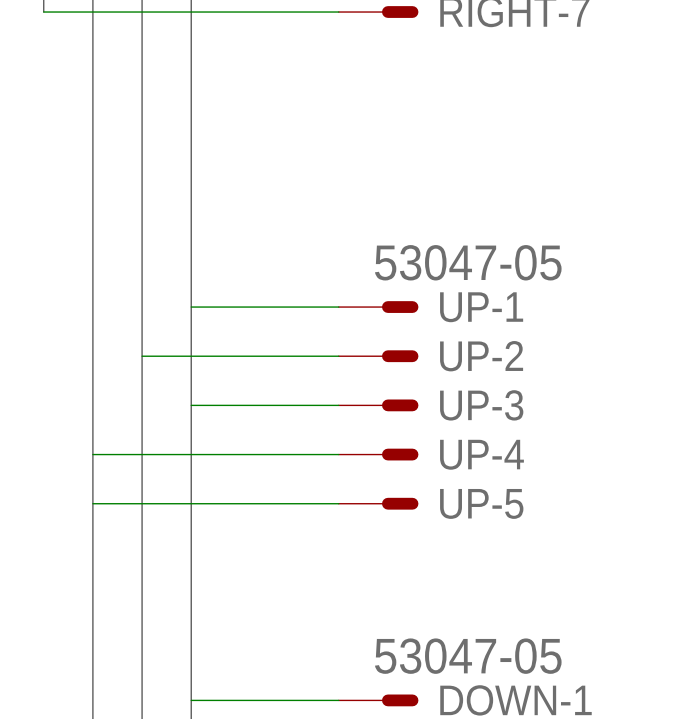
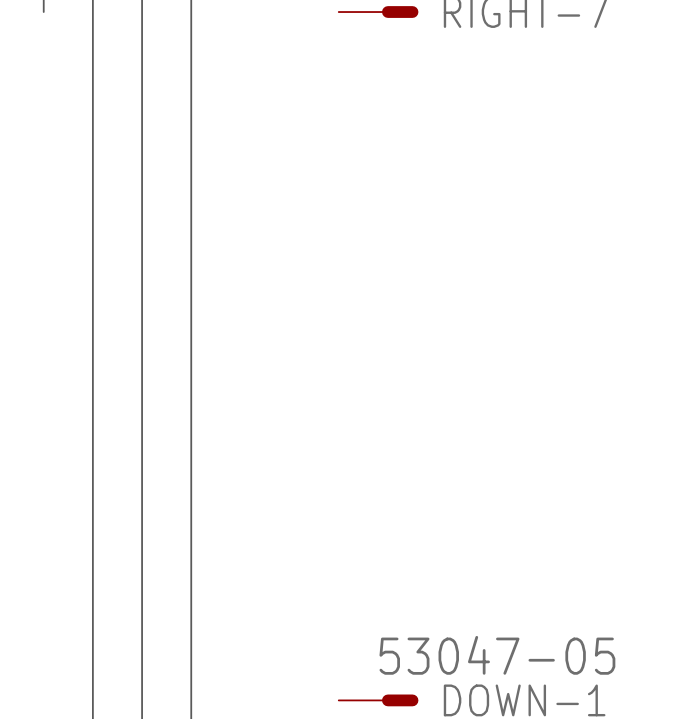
wire: (43, 12) (338, 12) -> none
wire: (191, 307) (338, 307) -> none
UP-1: 53047-05 (378, 307) -> none
wire: (142, 356) (338, 356) -> none
UP-2: (378, 356) -> none
wire: (191, 405) (338, 405) -> none
UP-3: (378, 405) -> none
wire: (92, 454) (338, 454) -> none
UP-4: (378, 454) -> none
wire: (92, 503) (338, 503) -> none
UP-5: (378, 503) -> none
wire: (191, 700) (338, 700) -> none

